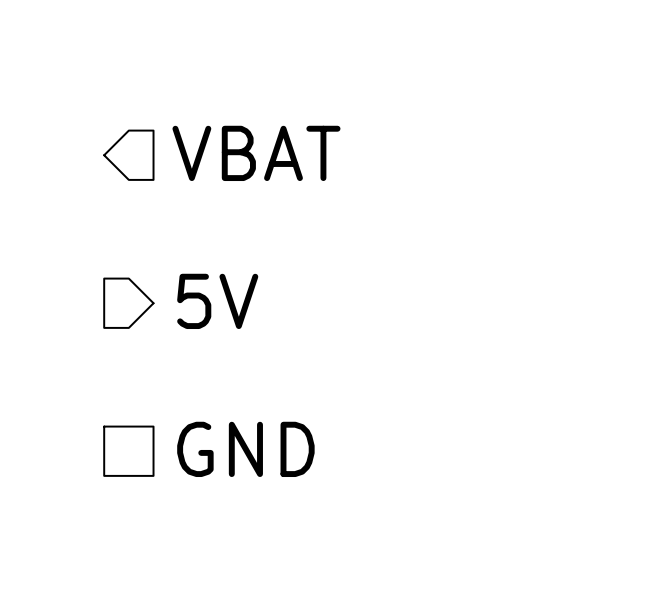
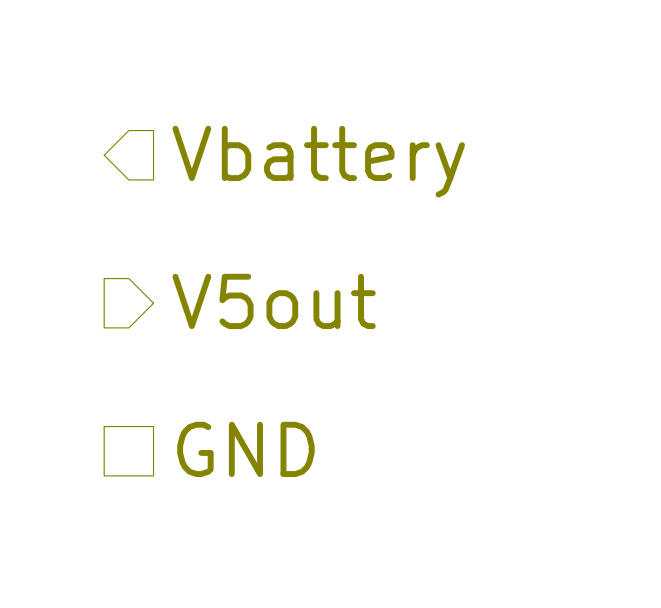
hierarchical label: VBAT (256, 153) -> Vbattery (318, 161)
hierarchical label: 5V (217, 301) -> V5out (274, 301)

